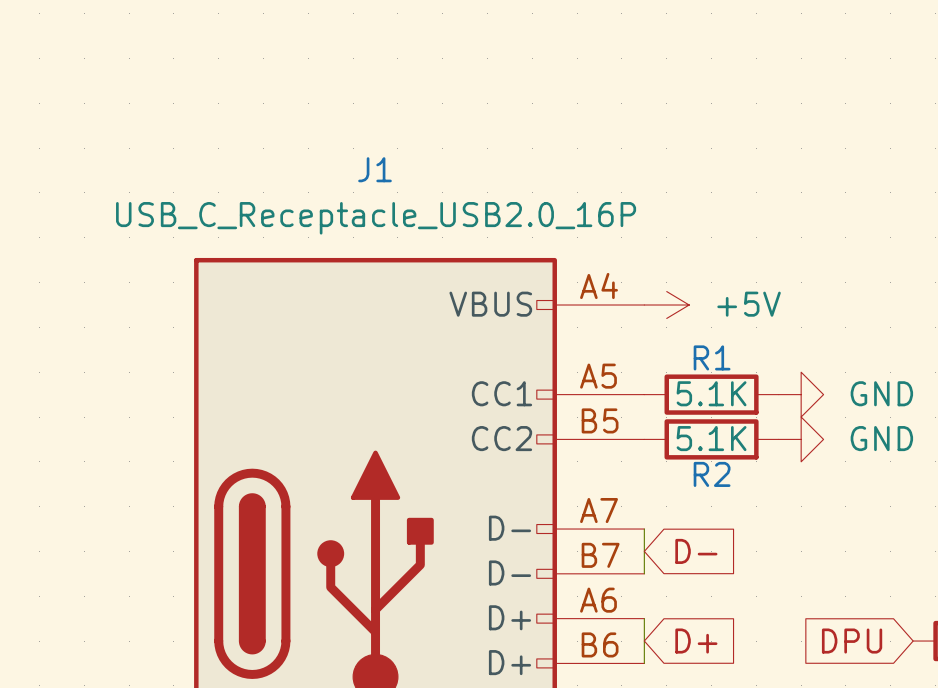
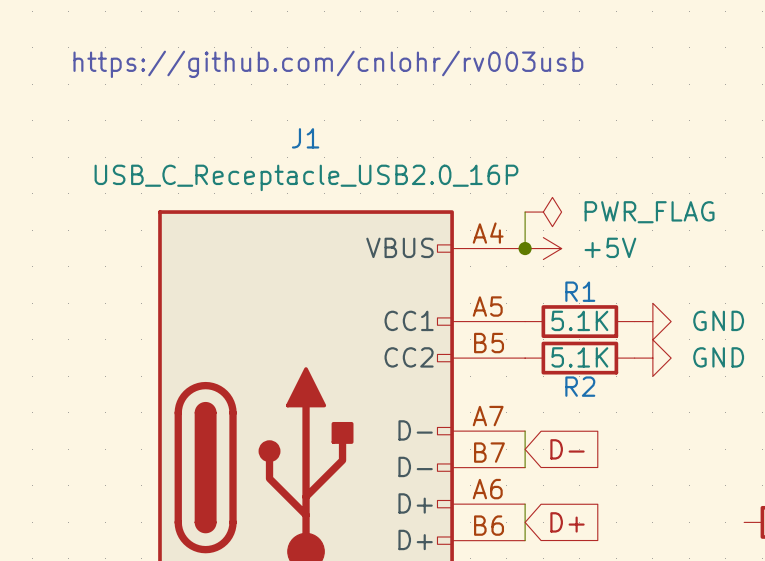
text: none -> https://github.com/cnlohr/rv003usb (328, 64)
wire: none -> (525, 212) (525, 248)
power symbol: none -> PWR_FLAG (543, 212)
junction: none -> (525, 248)
global label: DPU (852, 641) -> none

